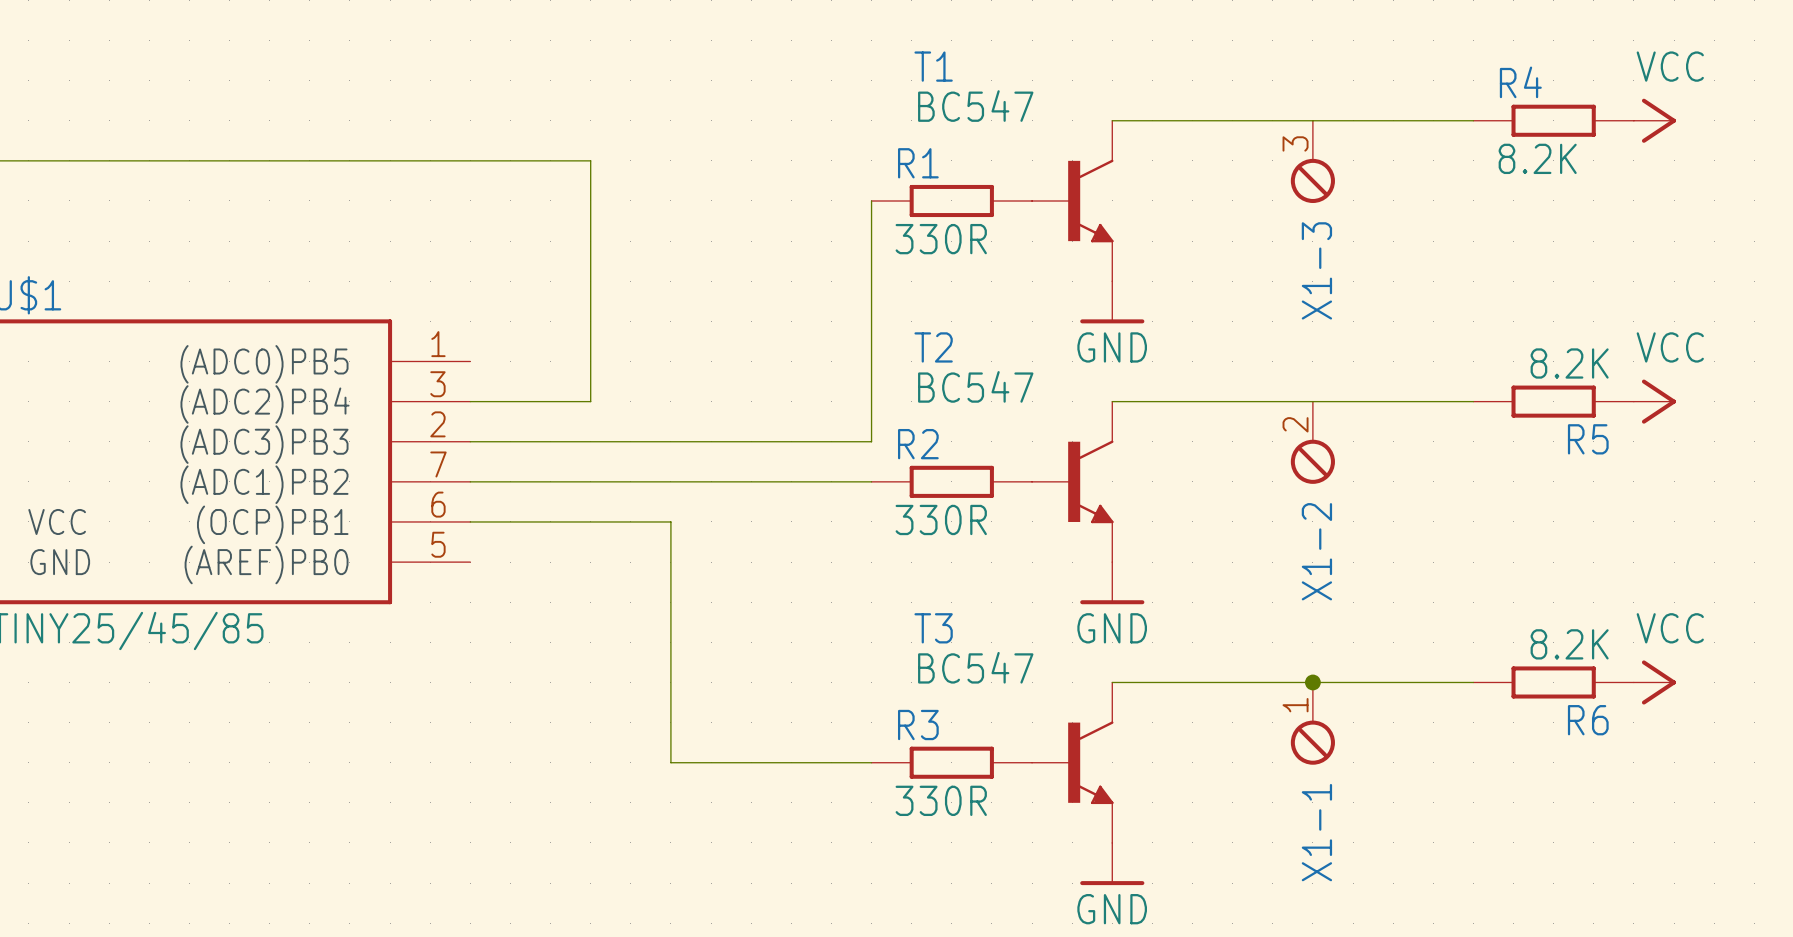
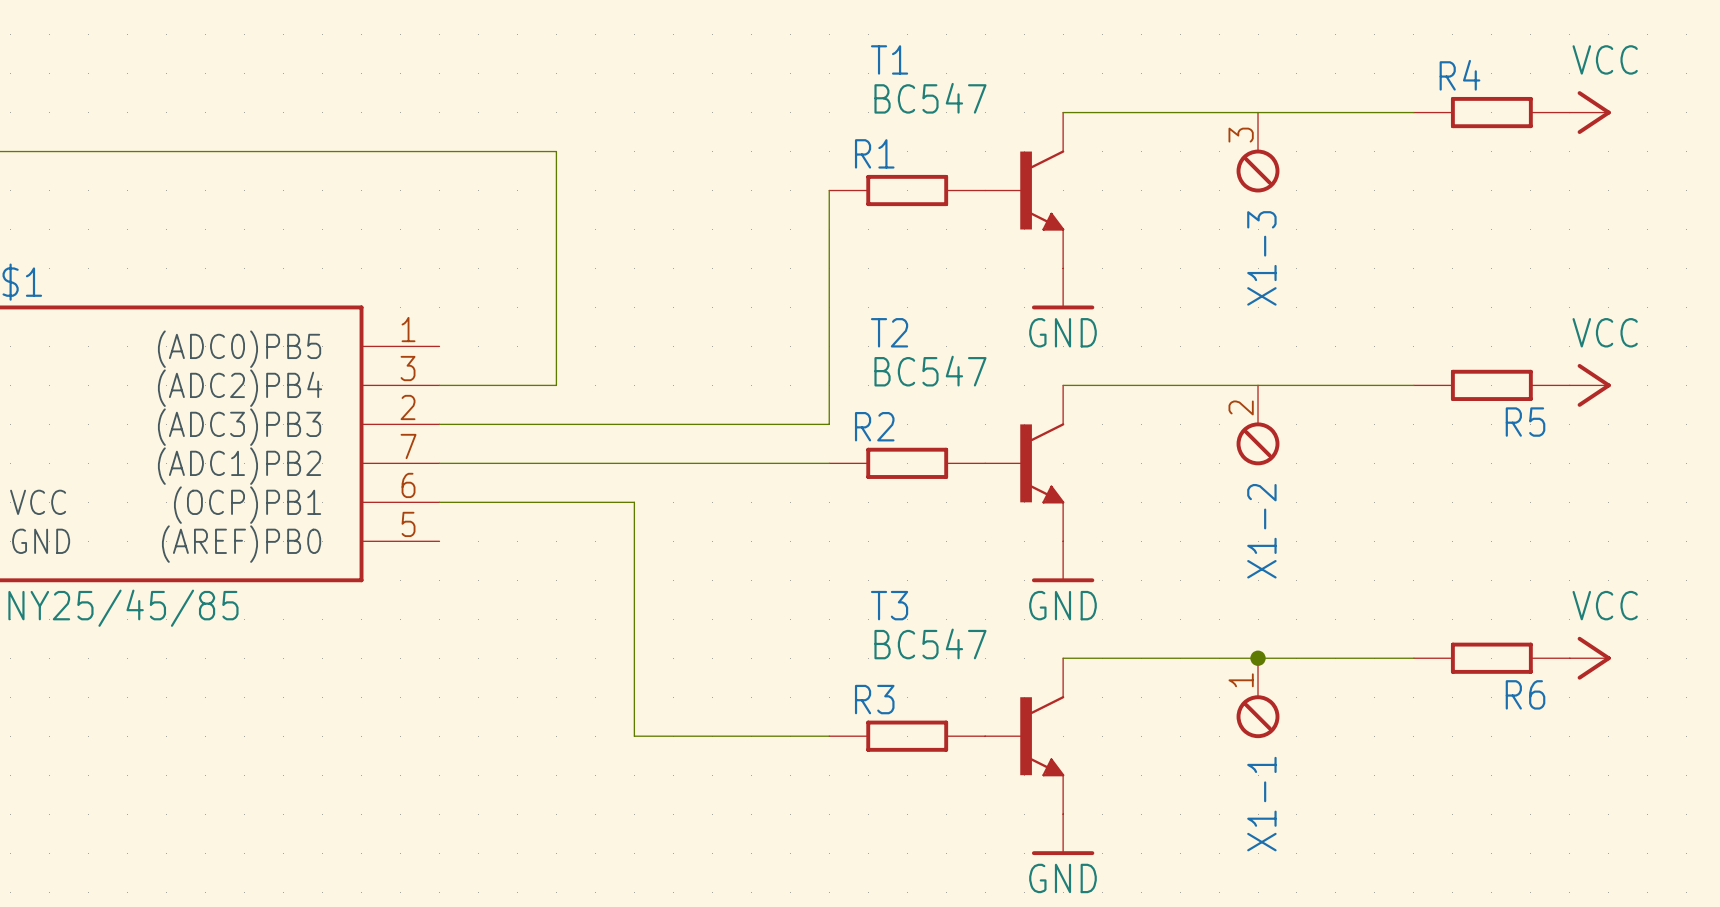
R4 value: 8.2K (1537, 158) -> none
R1 value: 330R (941, 239) -> none
R5 value: 8.2K (1569, 363) -> none
R2 value: 330R (941, 519) -> none
R6 value: 8.2K (1569, 644) -> none
R3 value: 330R (941, 800) -> none

